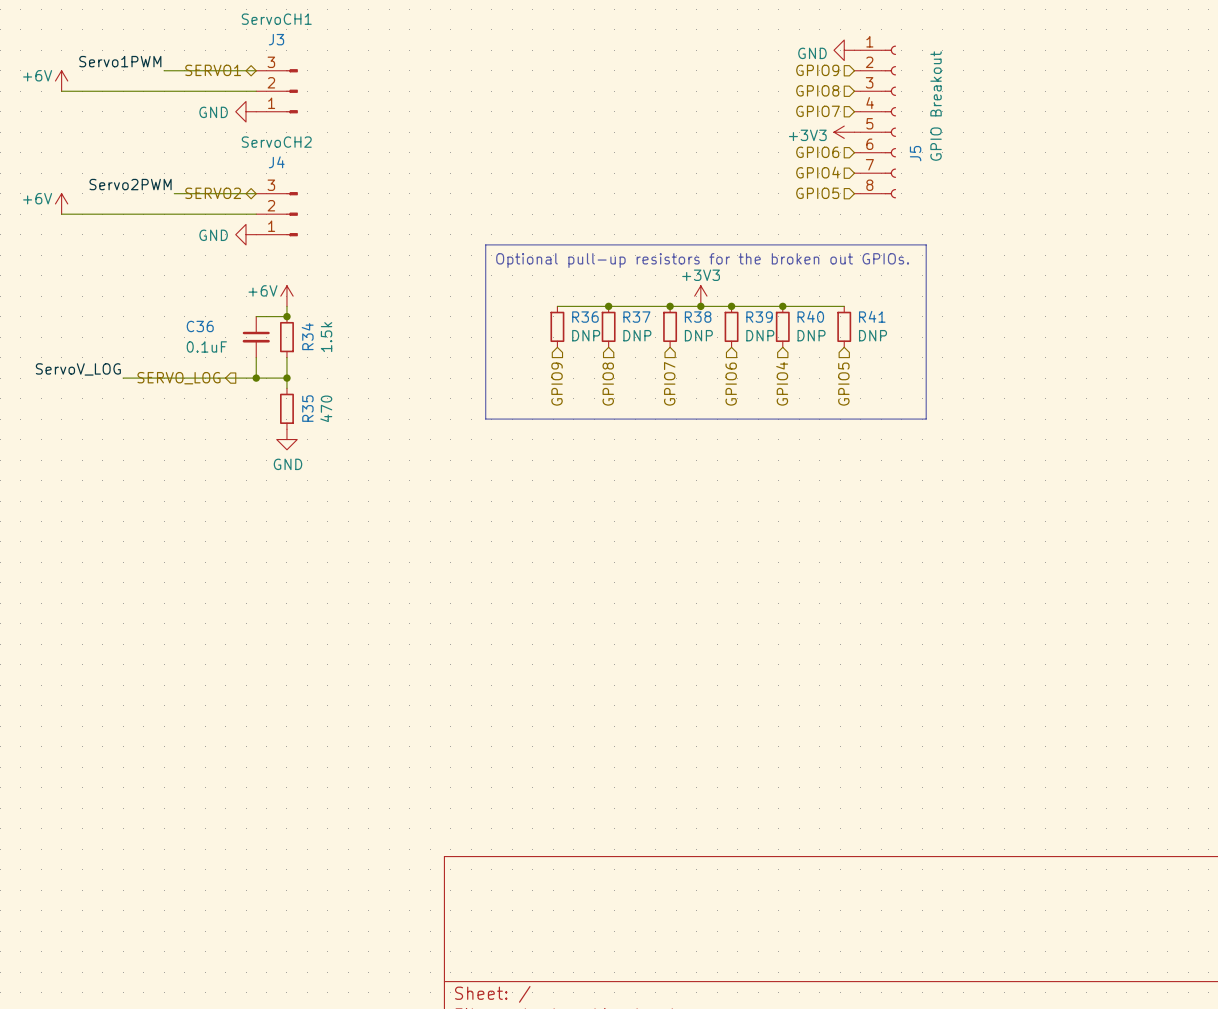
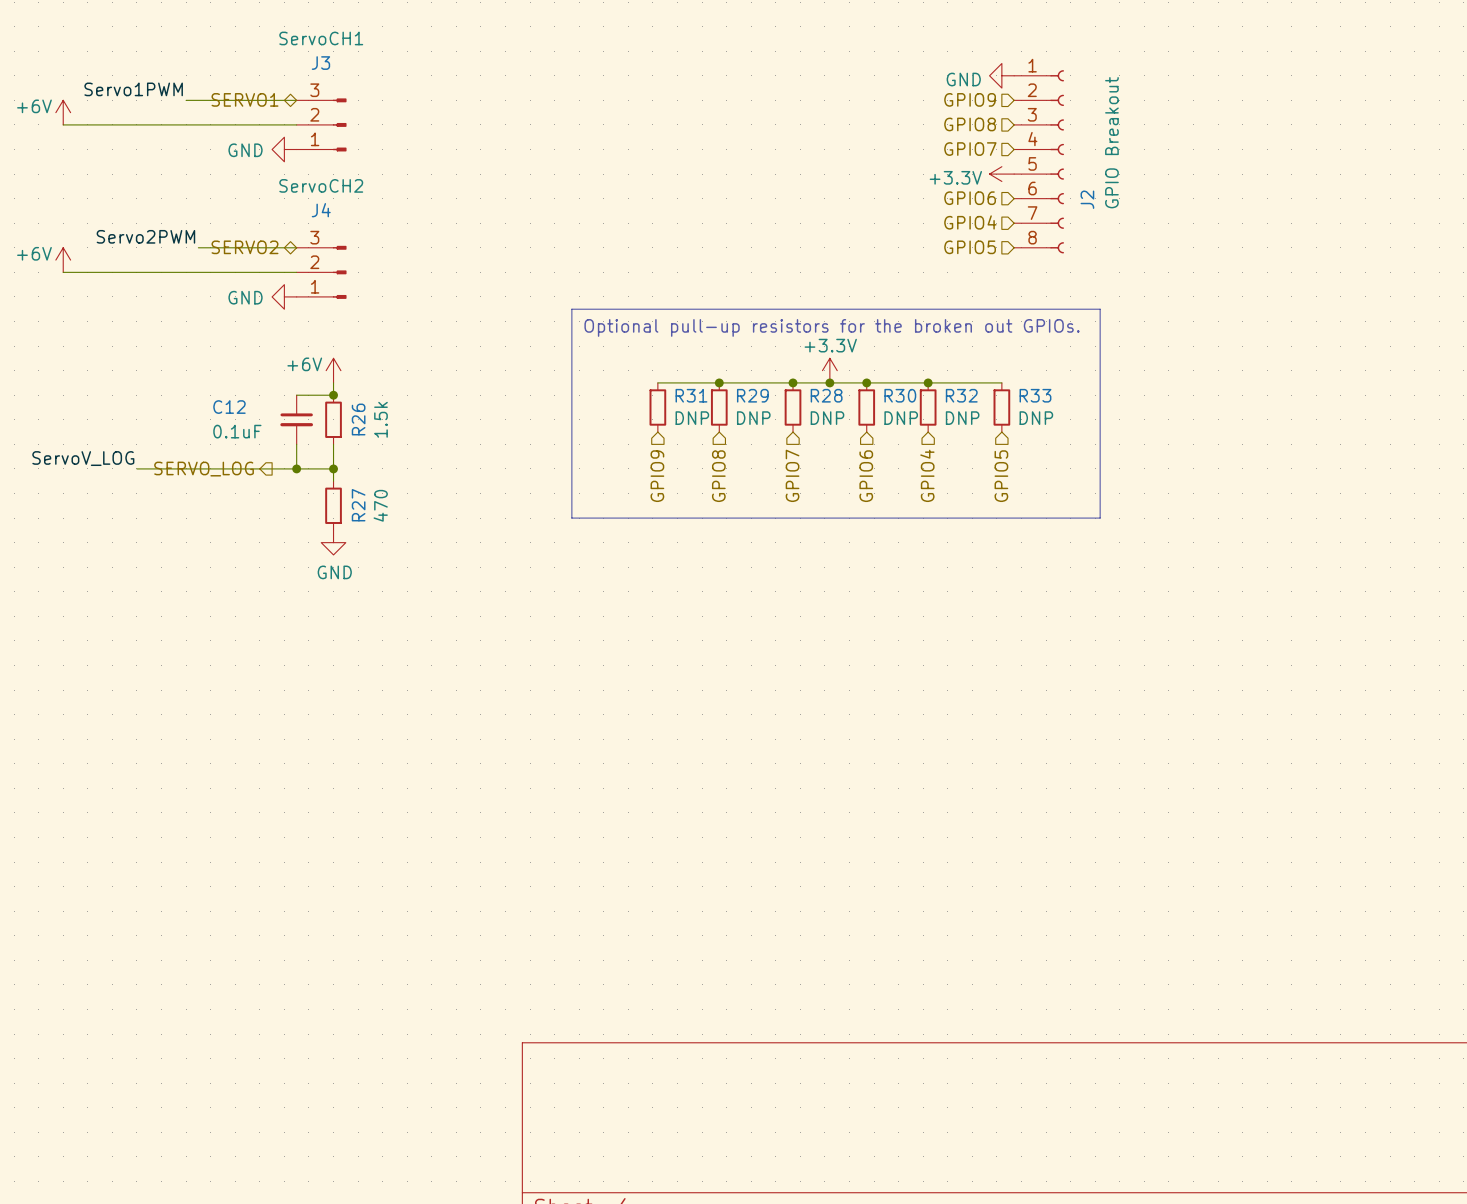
power symbol: +3V3 (844, 132) -> +3.3V (1001, 174)
J5 name: J5 (915, 153) -> J2 (1087, 199)
power symbol: +3V3 (700, 296) -> +3.3V (829, 370)
R40 name: R40 (810, 316) -> R32 (961, 395)
R41 name: R41 (872, 316) -> R33 (1035, 395)
R36 name: R36 (585, 317) -> R31 (691, 395)
R37 name: R37 (636, 317) -> R29 (752, 395)
R38 name: R38 (698, 317) -> R28 (826, 395)
R39 name: R39 (759, 317) -> R30 (900, 395)
C36 name: C36 (200, 326) -> C12 (229, 407)
R34 name: R34 (307, 336) -> R26 (358, 419)
R35 name: R35 (307, 408) -> R27 (358, 505)

